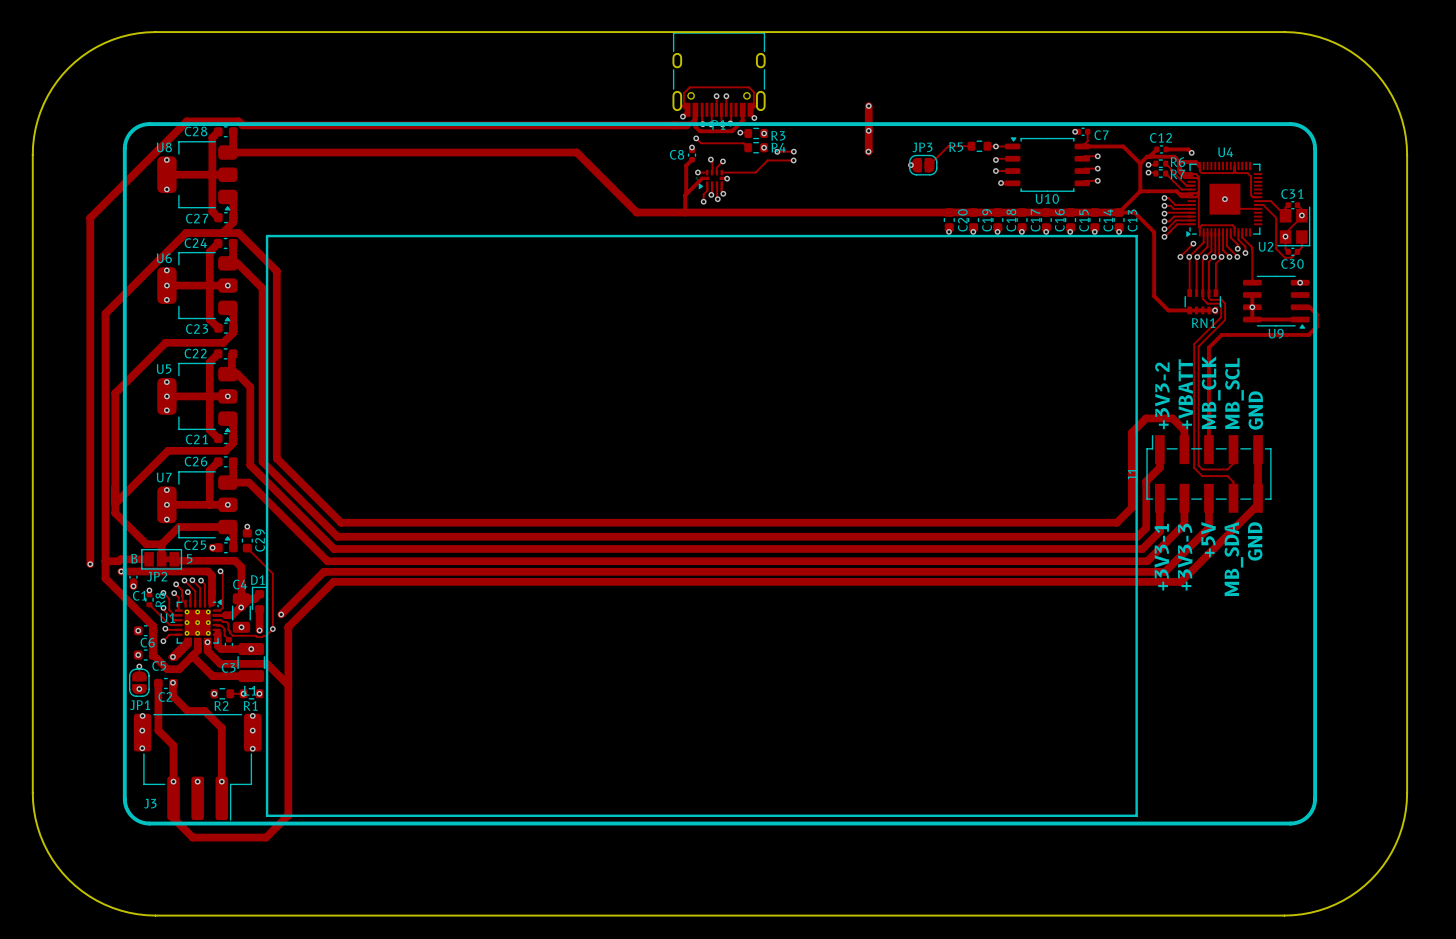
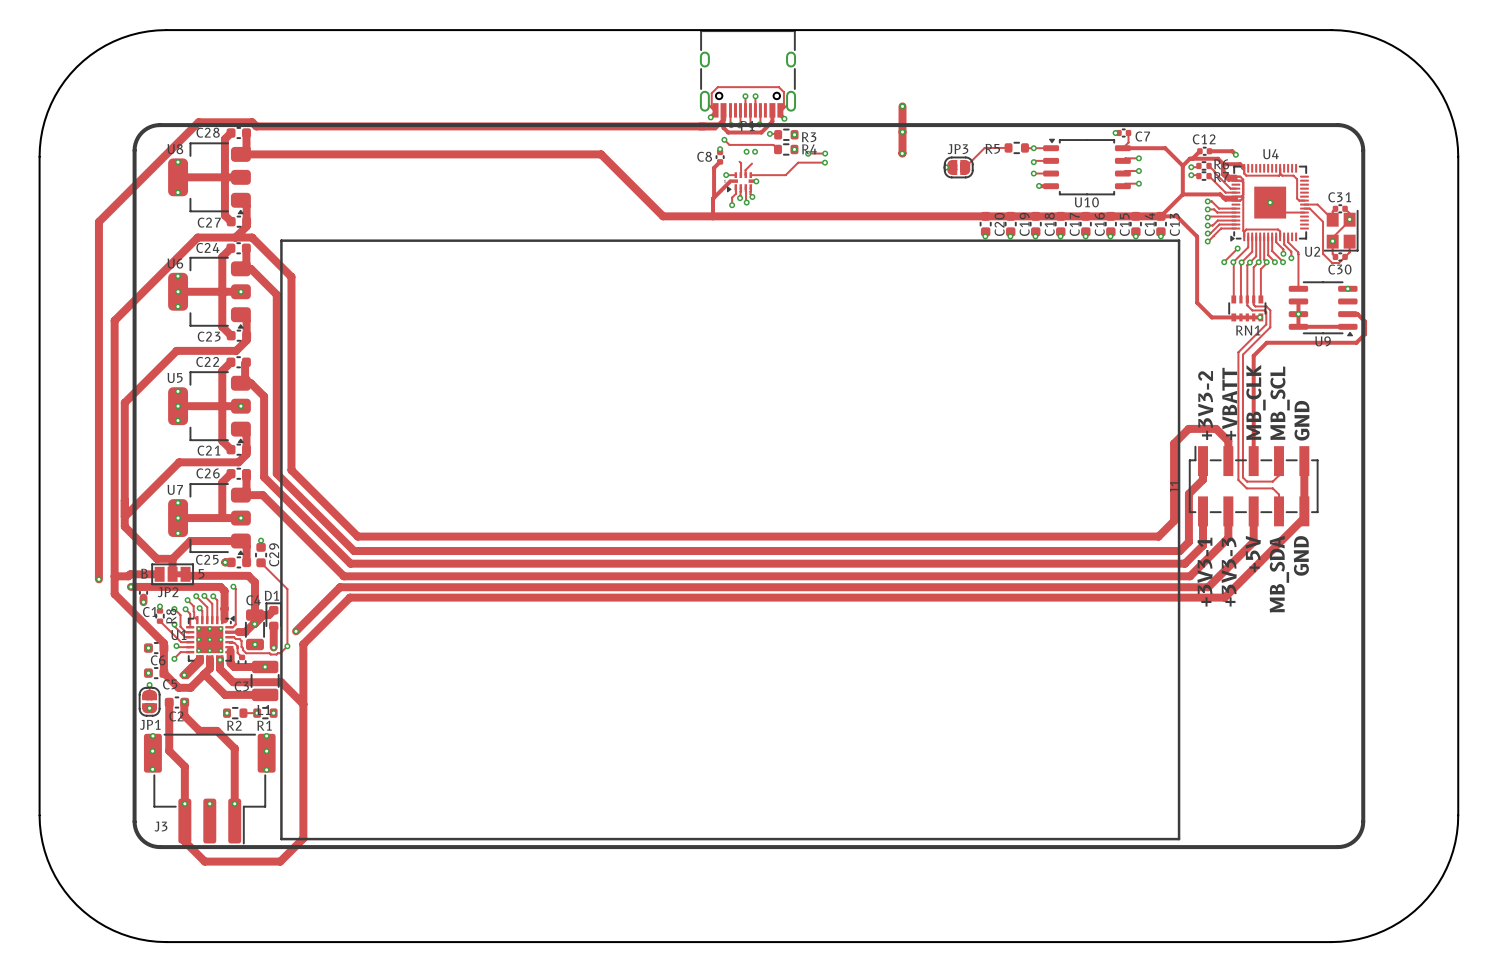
via: none -> (746, 151)
via: none -> (755, 151)
via: (710, 159) -> none
via: (722, 161) -> none

